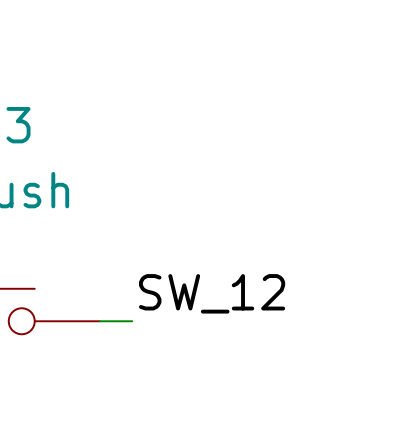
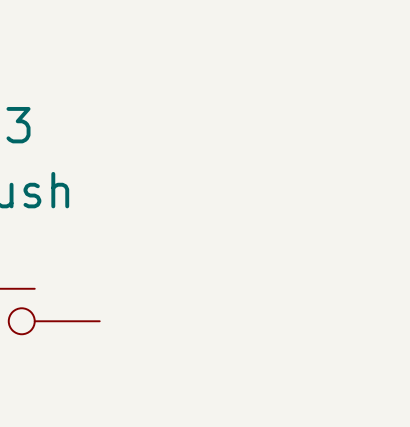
label: SW_12 (212, 293) -> none
wire: (99, 321) (132, 321) -> none

